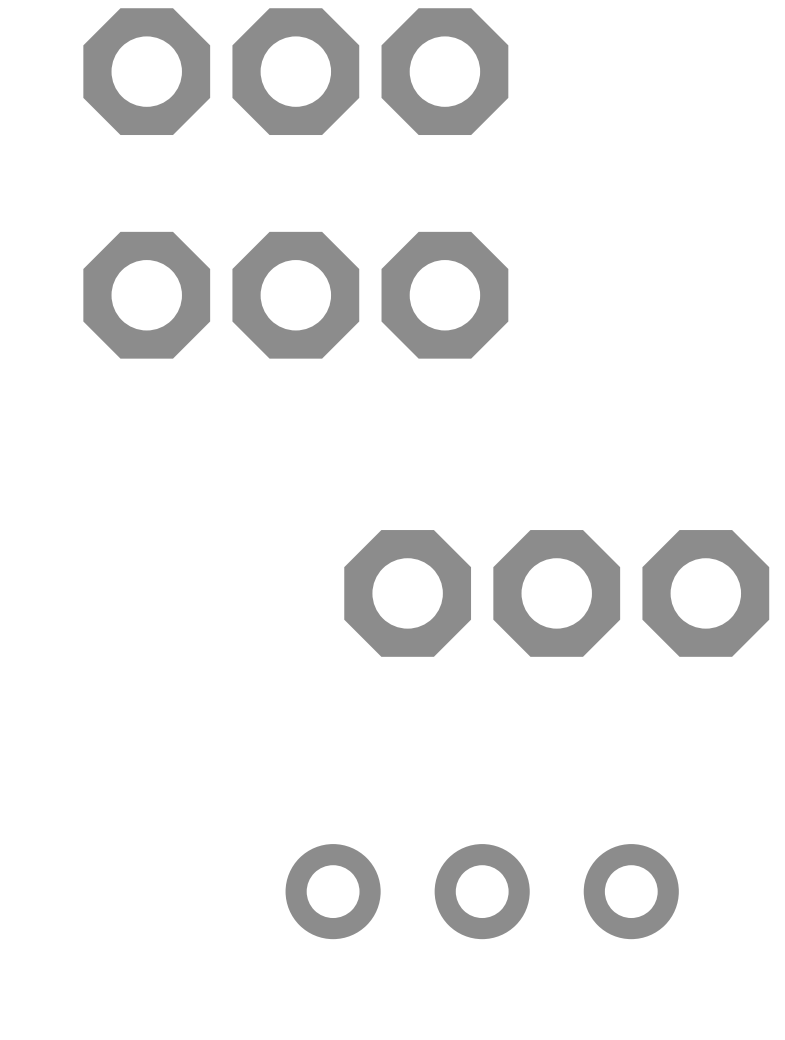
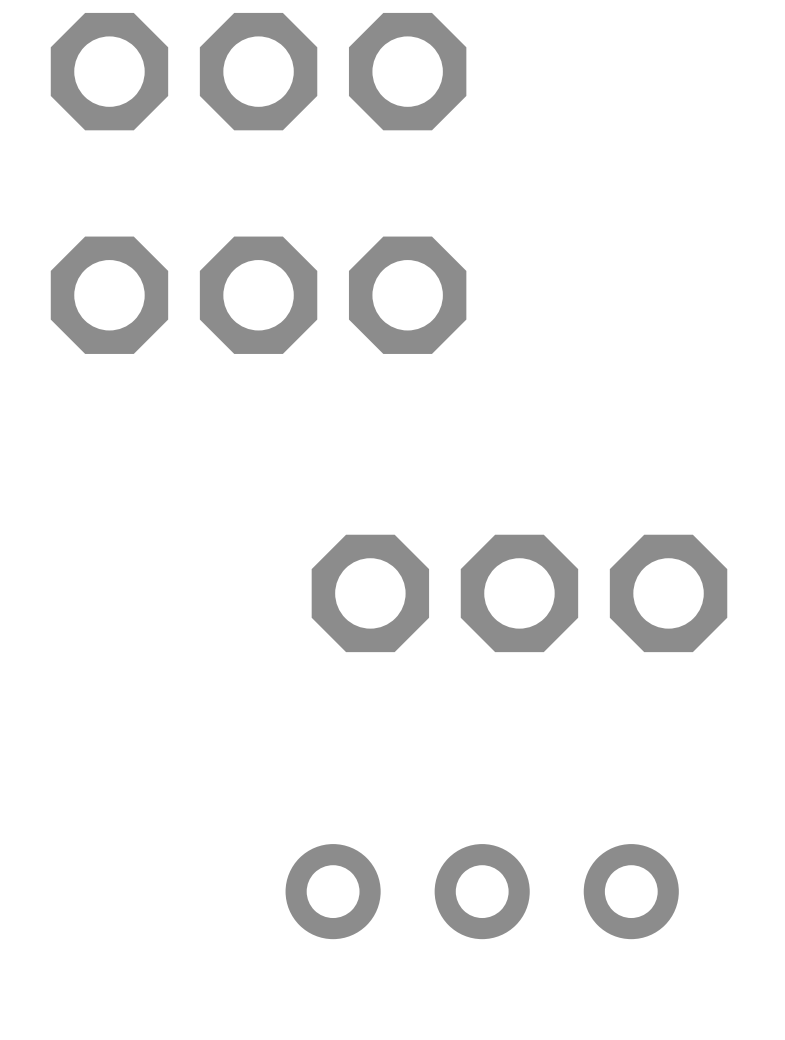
part footprint: [83, 8, 509, 136] -> [50, 12, 467, 131]
part footprint: [83, 231, 509, 359] -> [50, 236, 467, 354]
part footprint: [344, 530, 770, 657] -> [311, 534, 728, 653]

